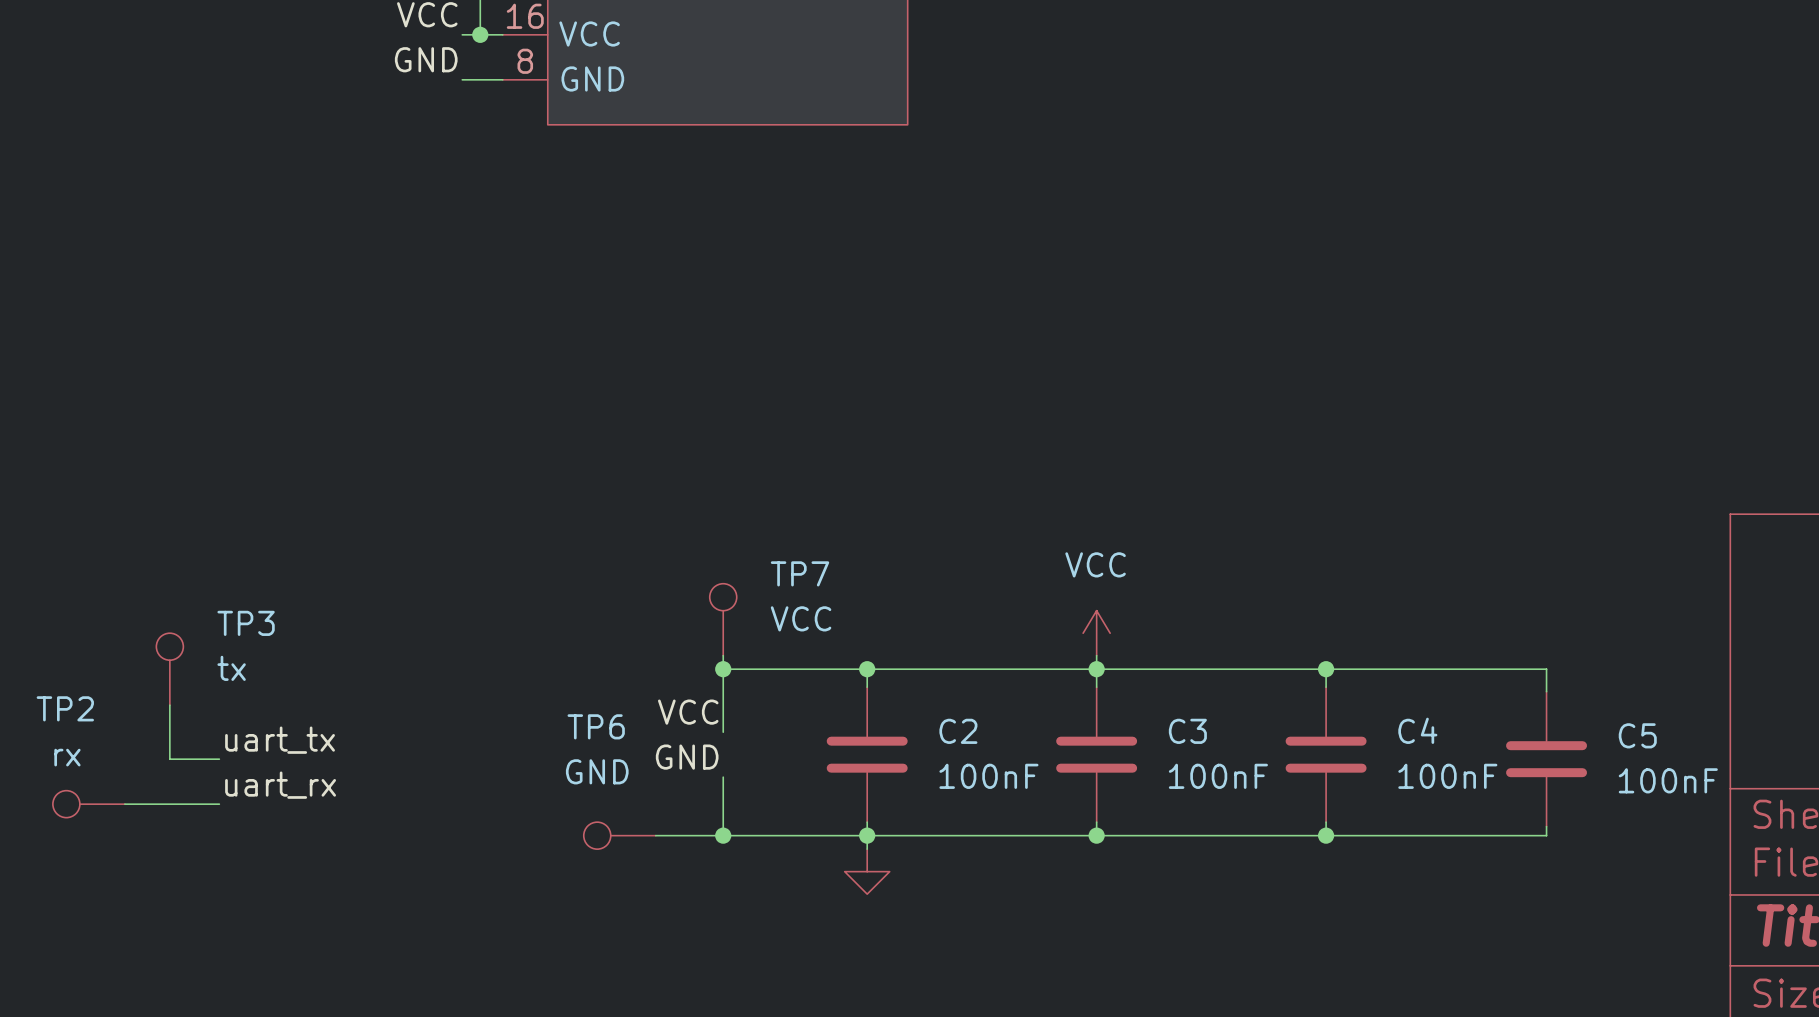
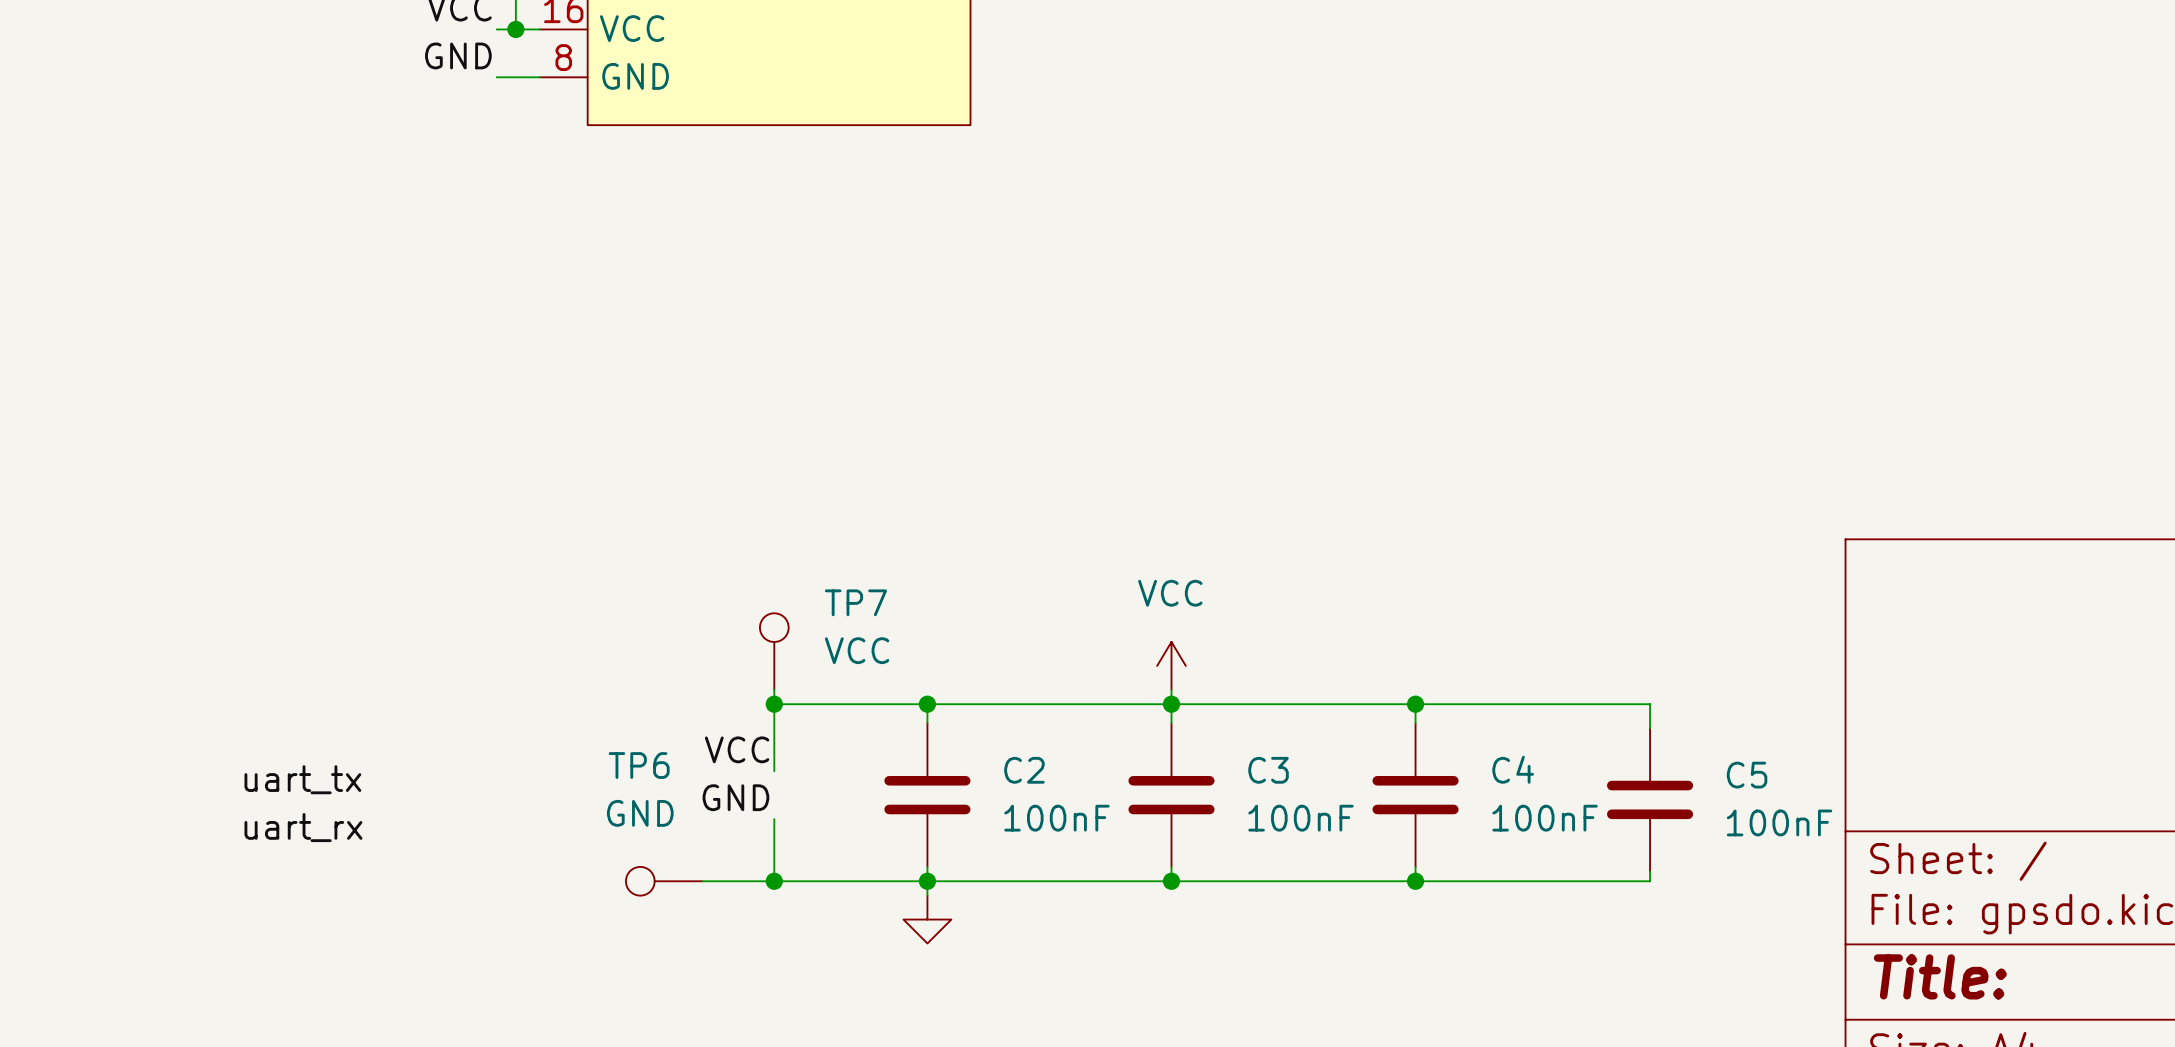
TP3: tx (169, 669) -> none
wire: (169, 705) (169, 759) (219, 759) -> none
TP2: rx (88, 804) -> none
wire: (124, 804) (219, 804) -> none

